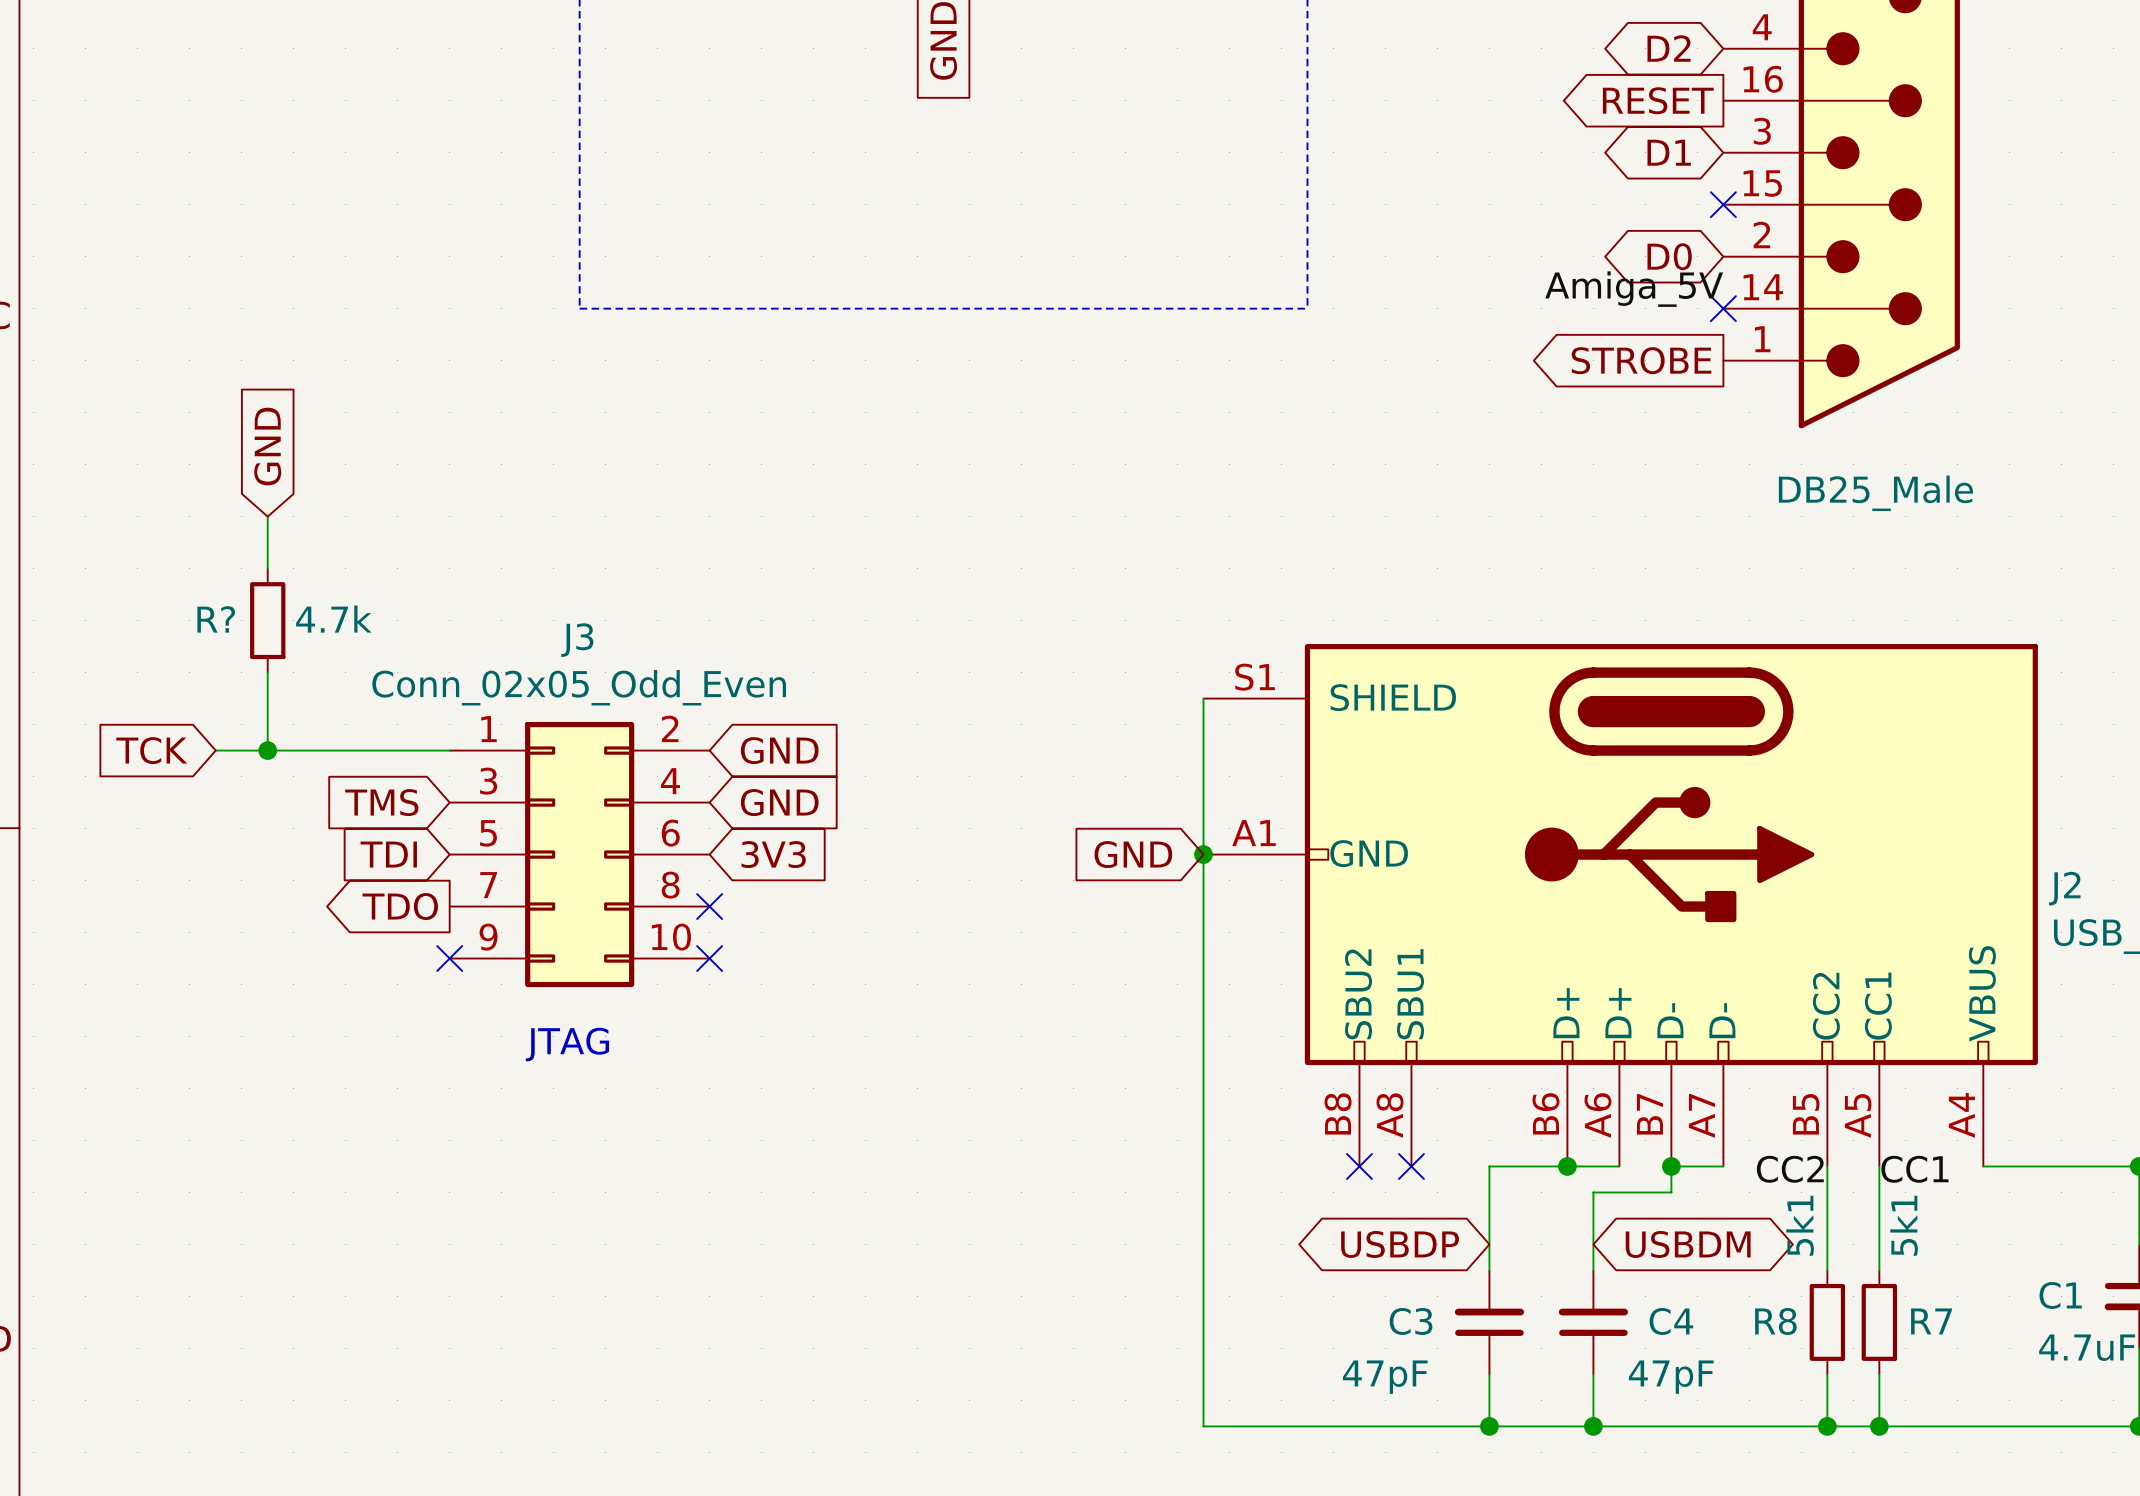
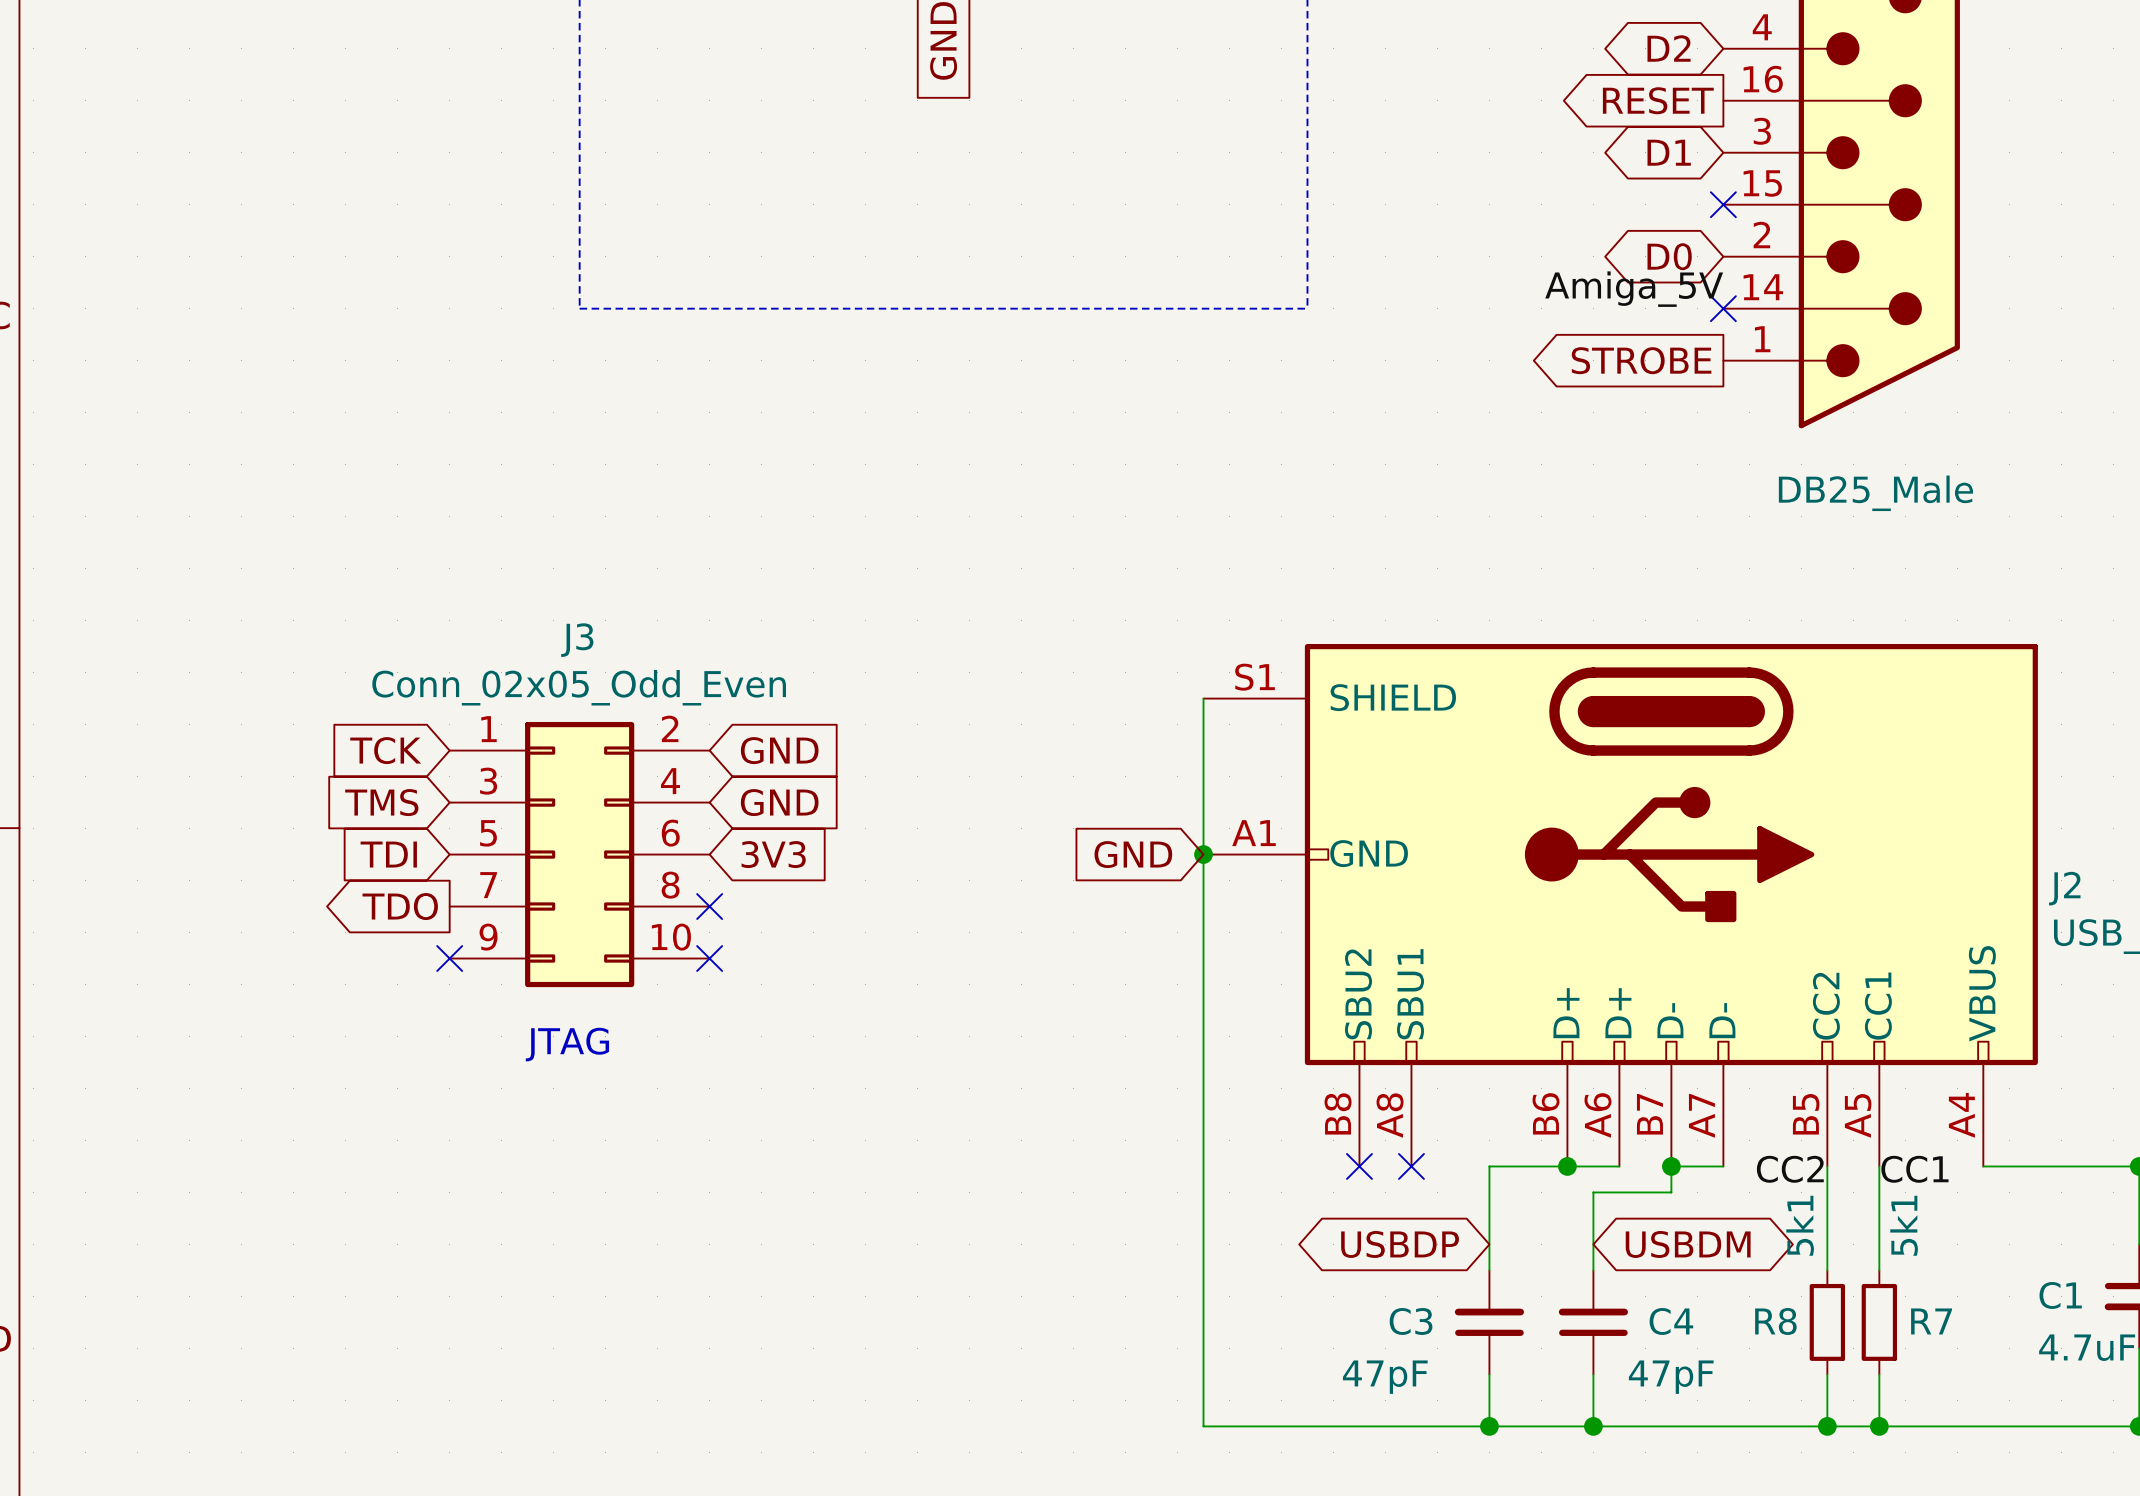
global label: GND (267, 446) -> none
wire: (267, 516) (267, 568) -> none
R?: 4.7k (267, 620) -> none
wire: (267, 672) (267, 750) -> none
global label position: TCK (151, 750) -> TCK (385, 750)
wire: (215, 750) (449, 750) -> none
junction: (267, 750) -> none

